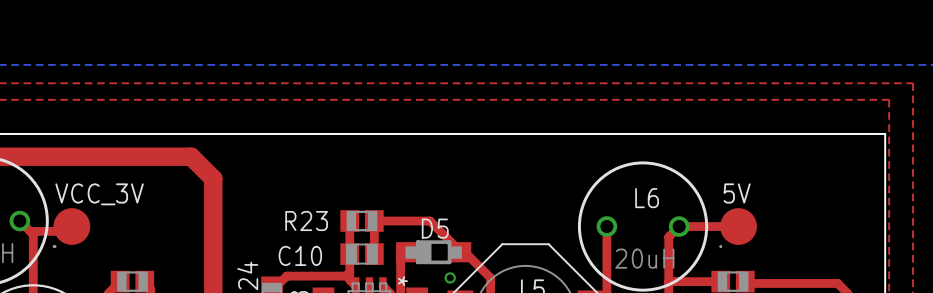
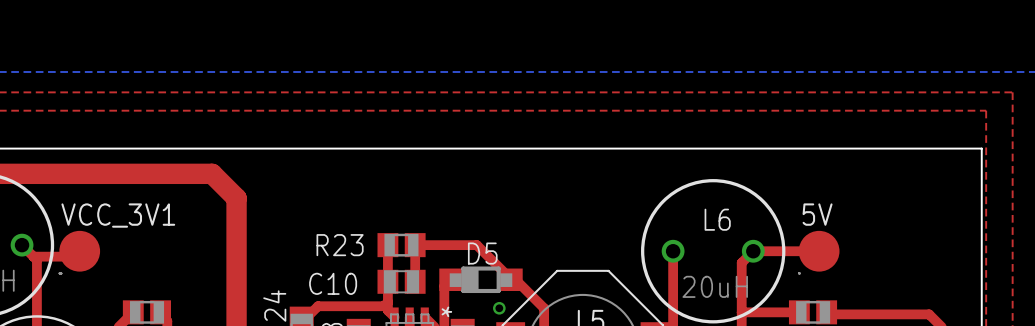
VCC_3V name: VCC_3V (99, 194) -> VCC_3V1 (118, 215)

